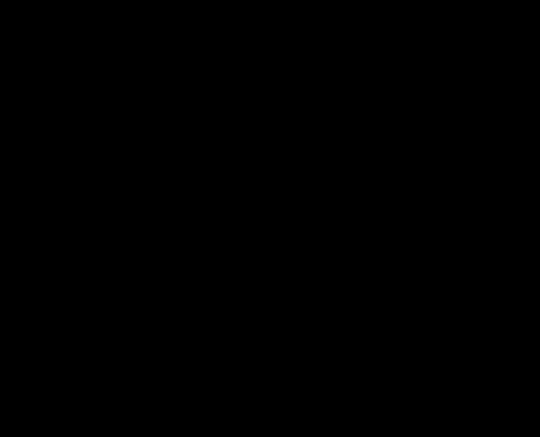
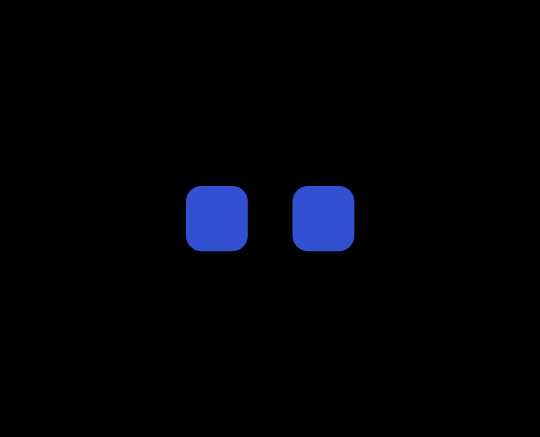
part: none -> (270, 218)

